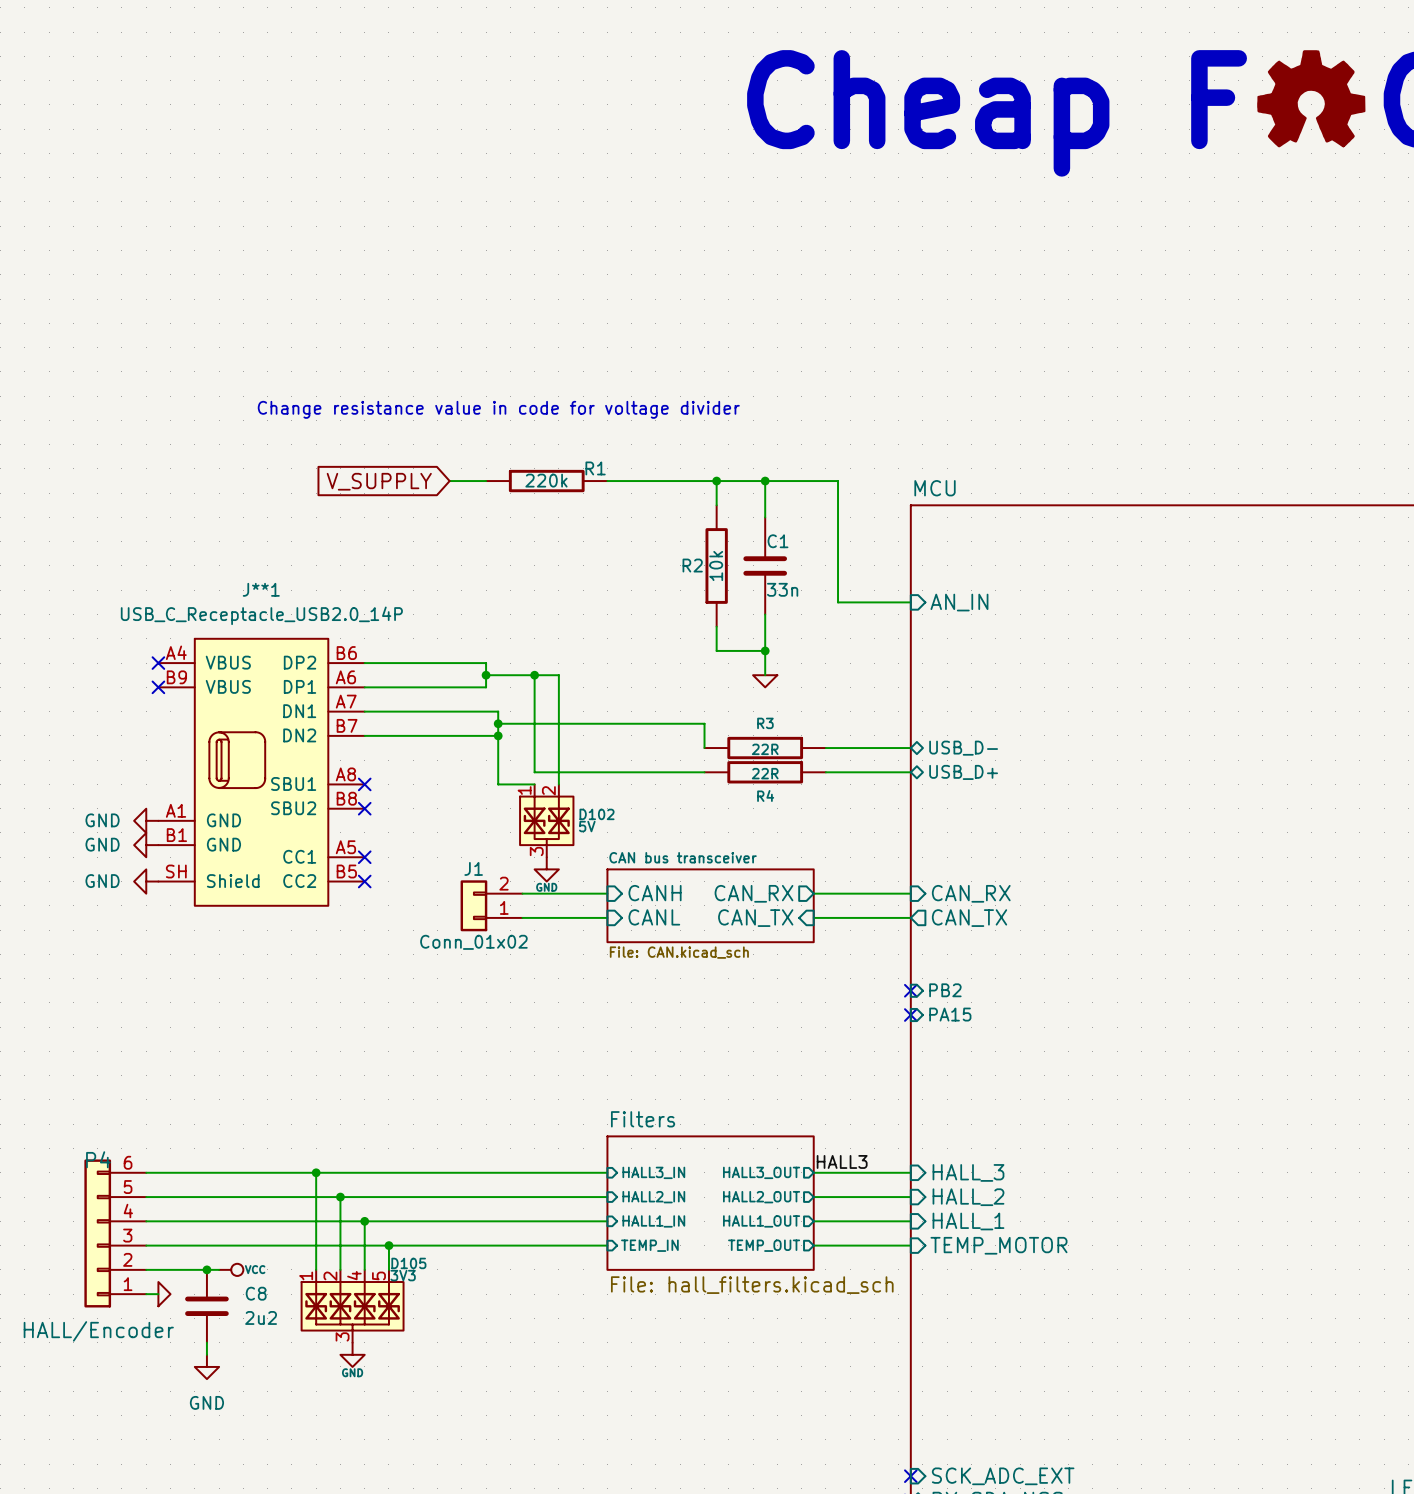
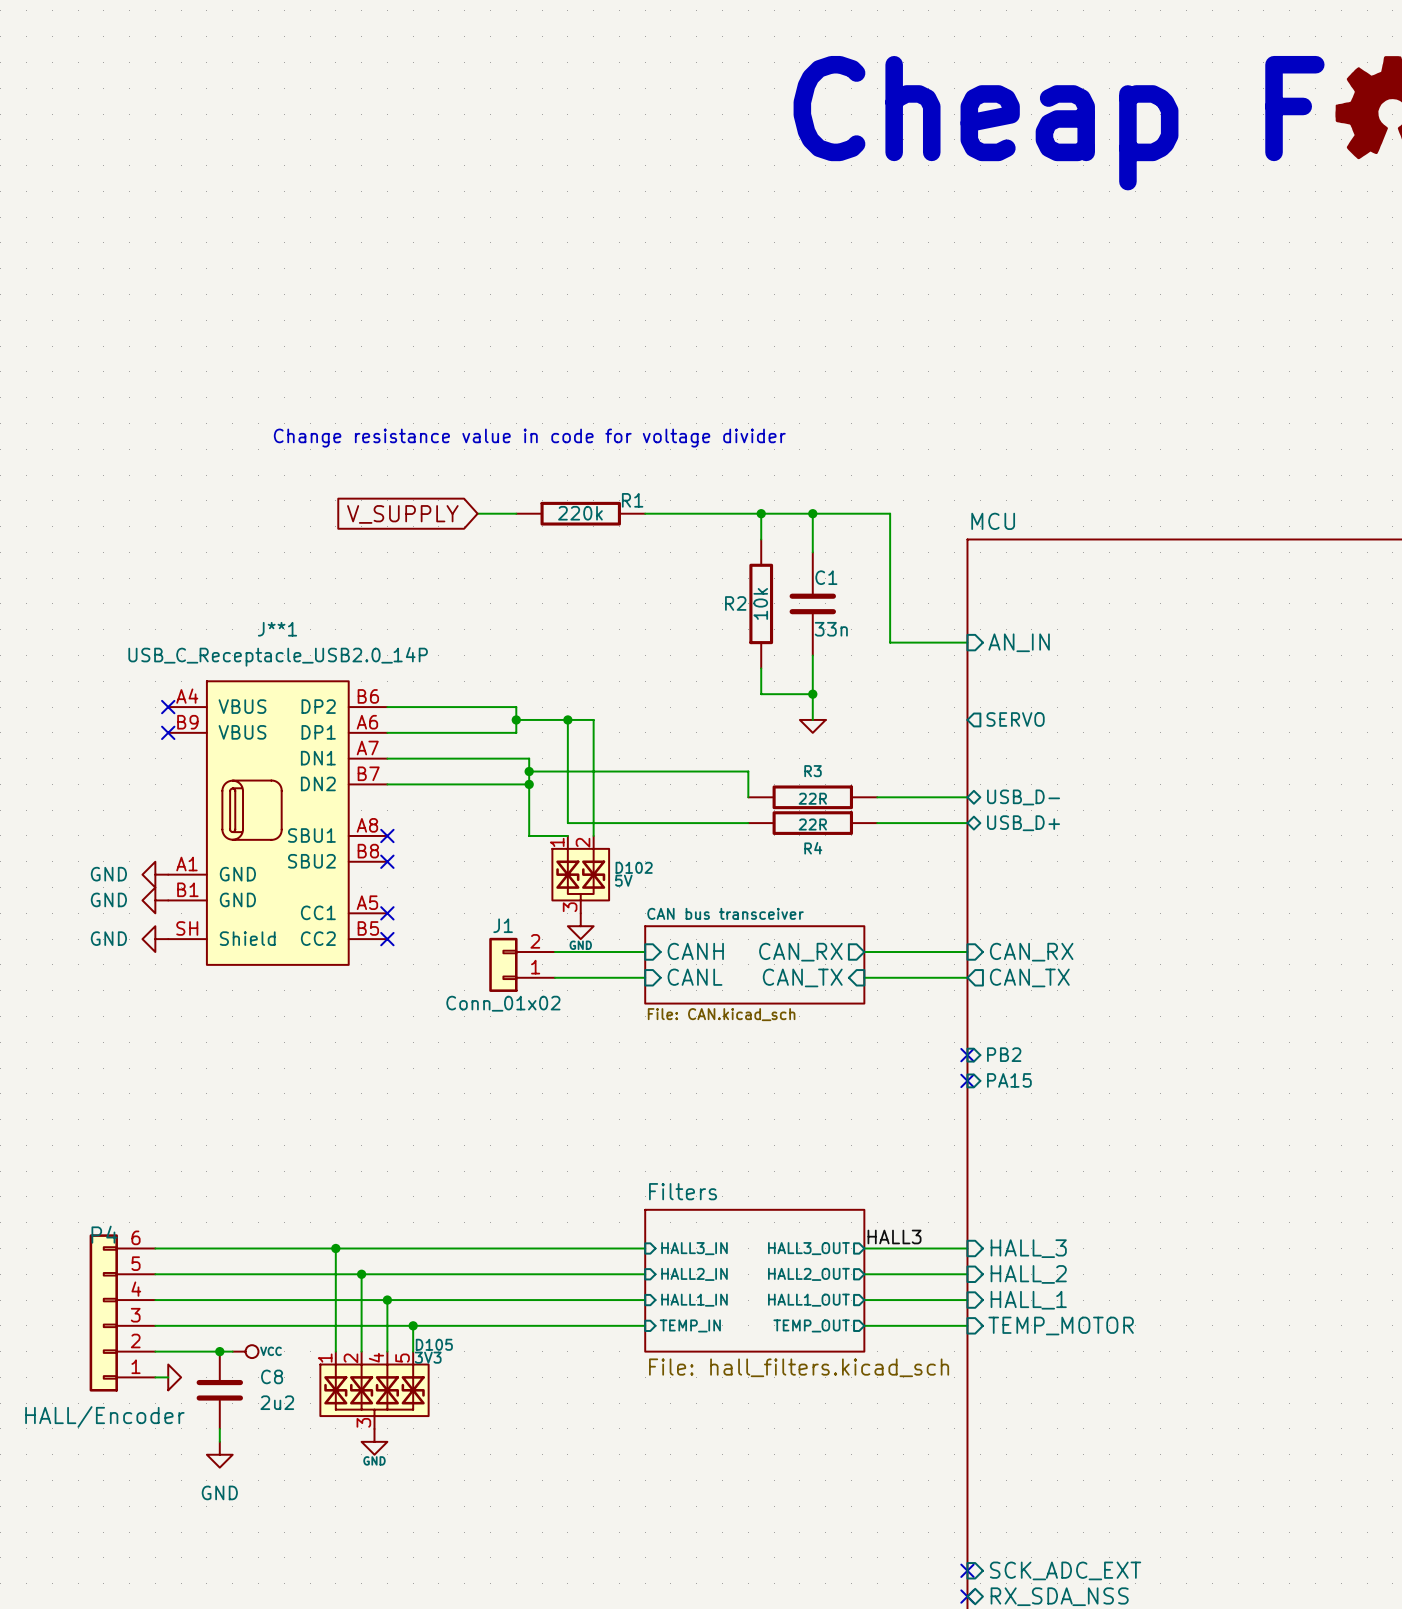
sheet pin: none -> SERVO (1015, 719)

